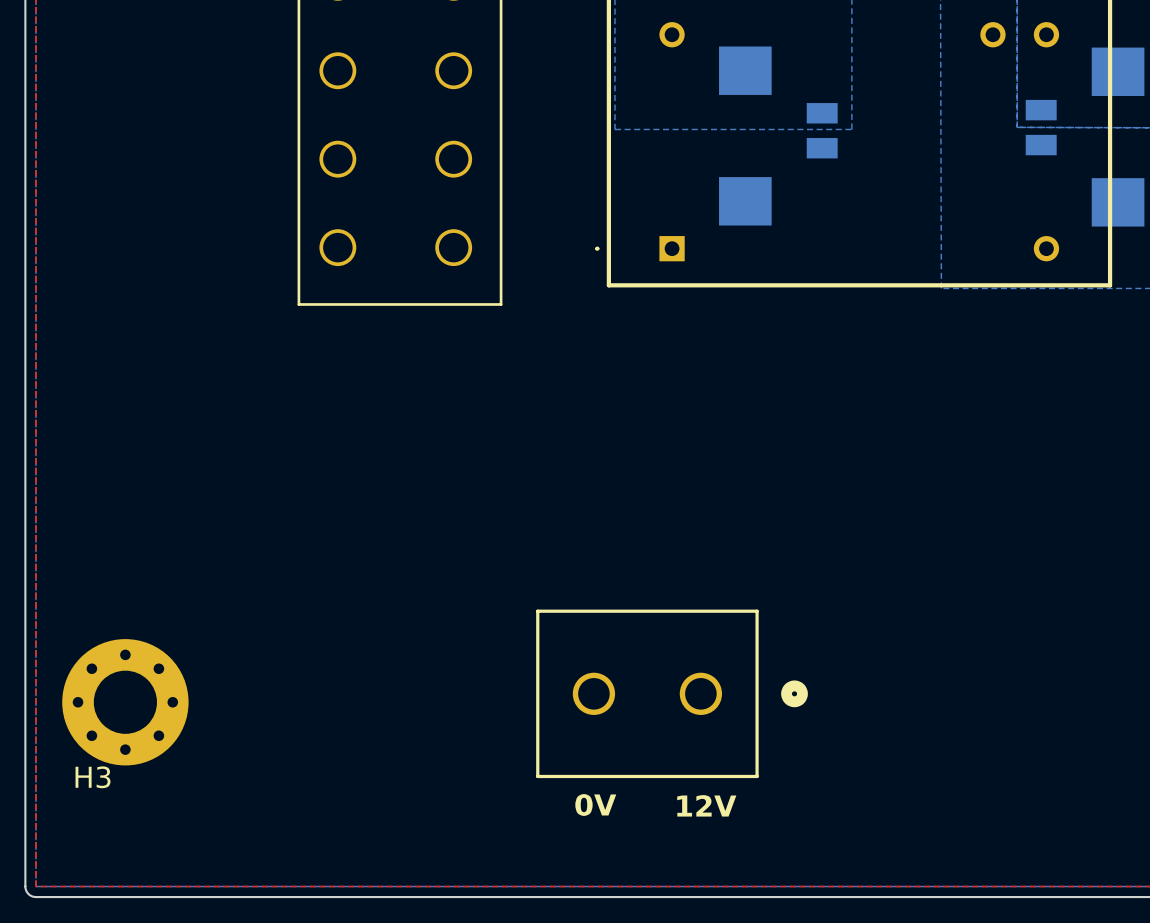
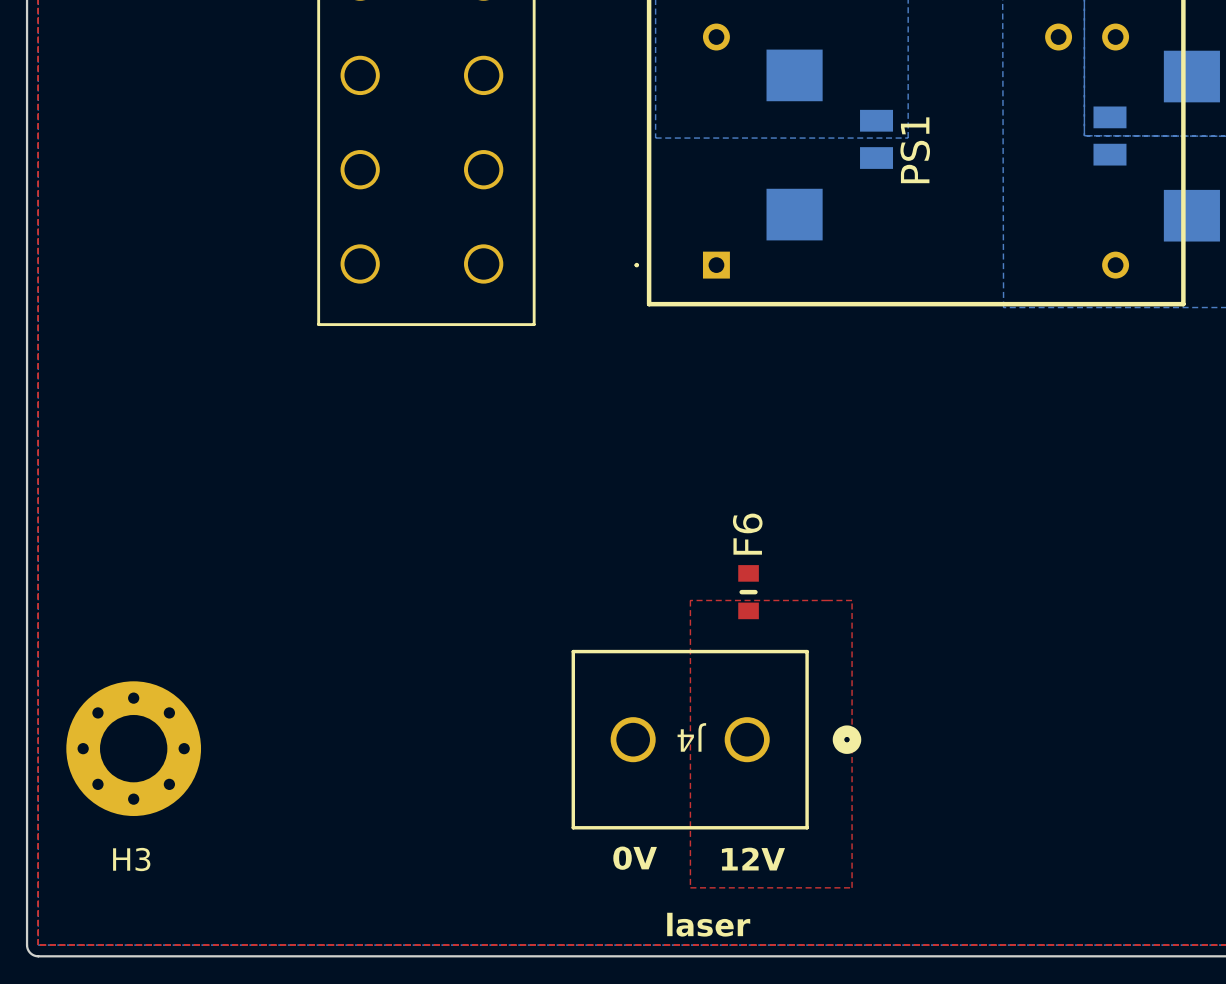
PS1 name: none -> PS1 (915, 150)
F6: none -> (748, 592)
top zone outline: none -> (690, 600) (690, 887) (852, 887) (852, 600) (690, 600)
J4 name: none -> J4 (691, 737)
H3 name position: H3 (93, 777) -> H3 (131, 859)
text: none -> laser (708, 924)

